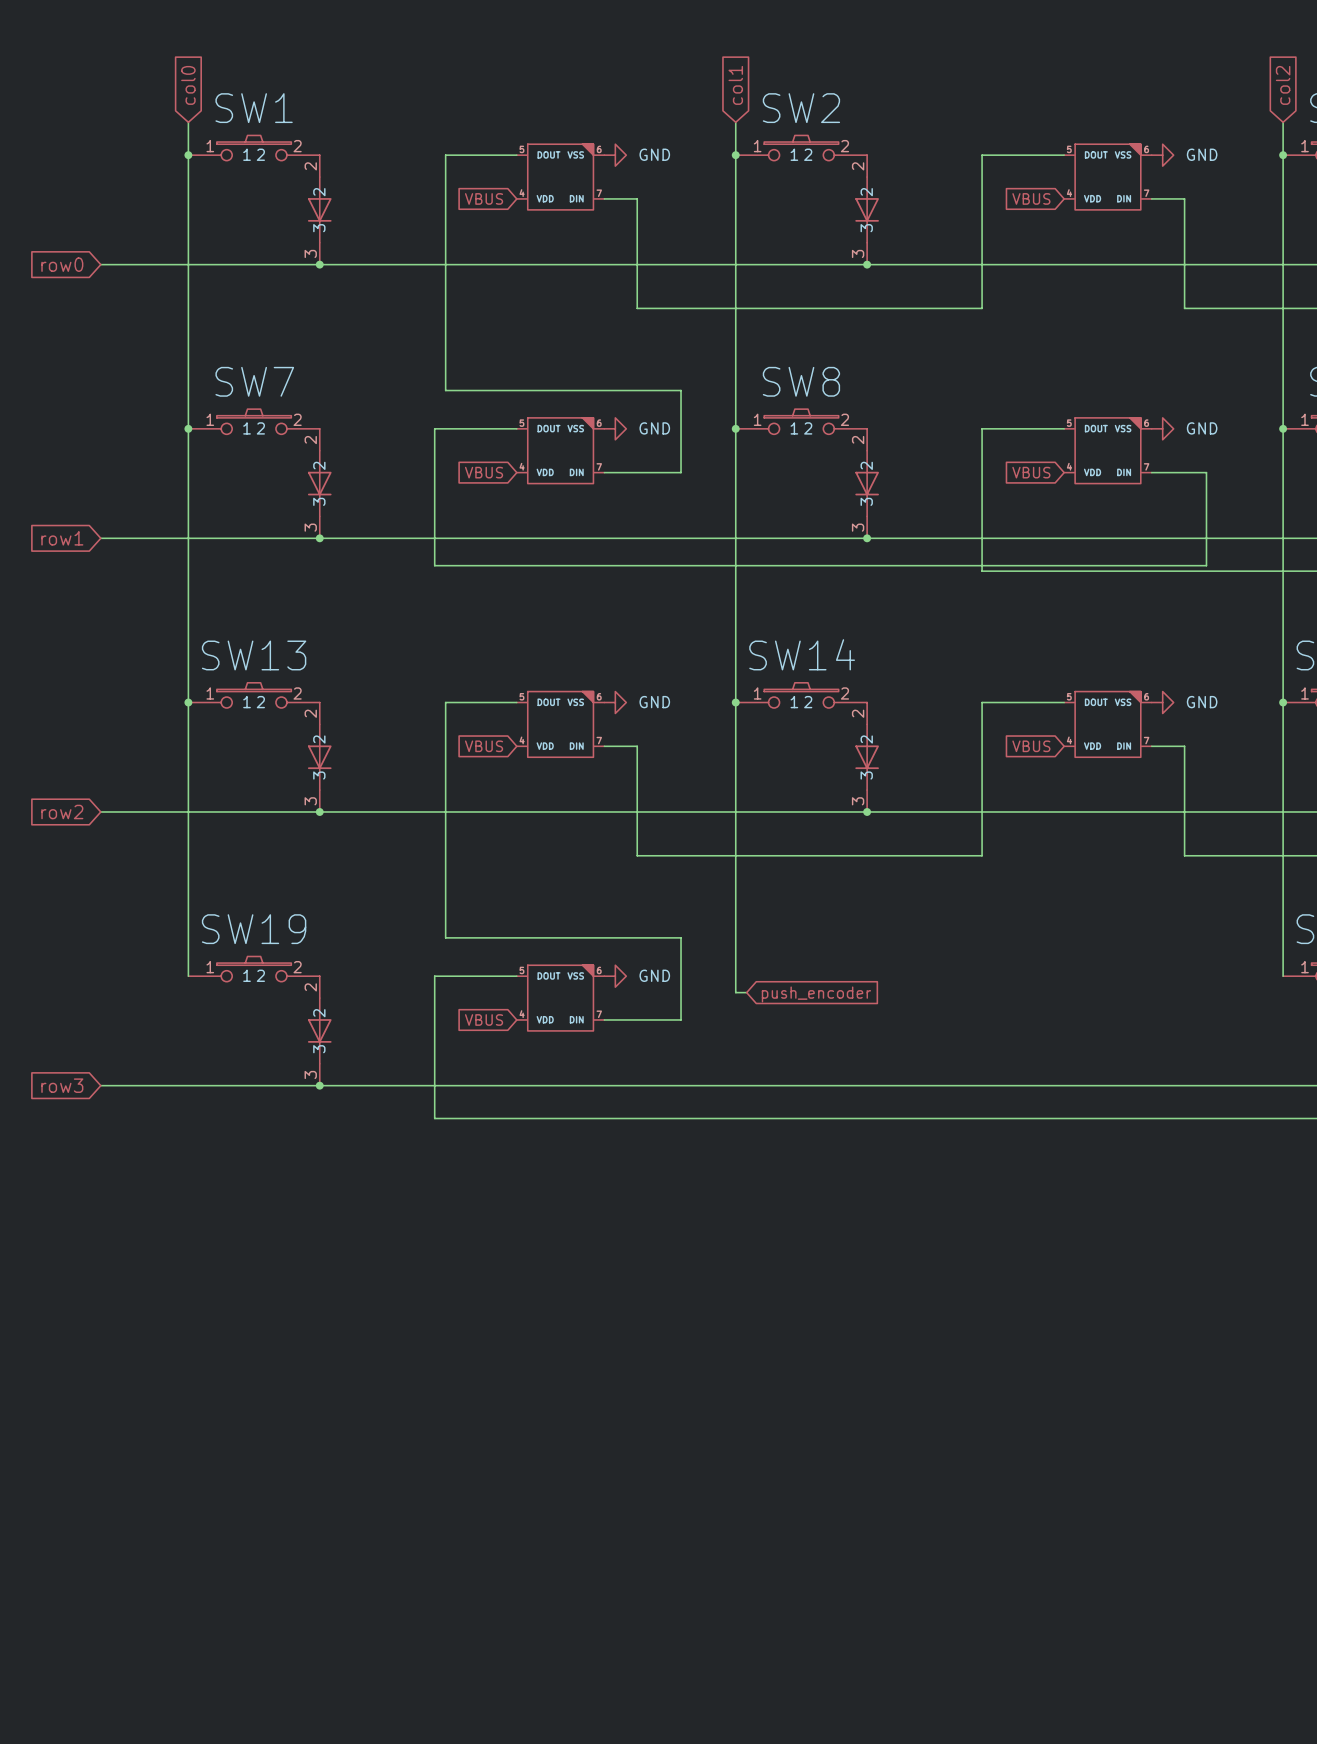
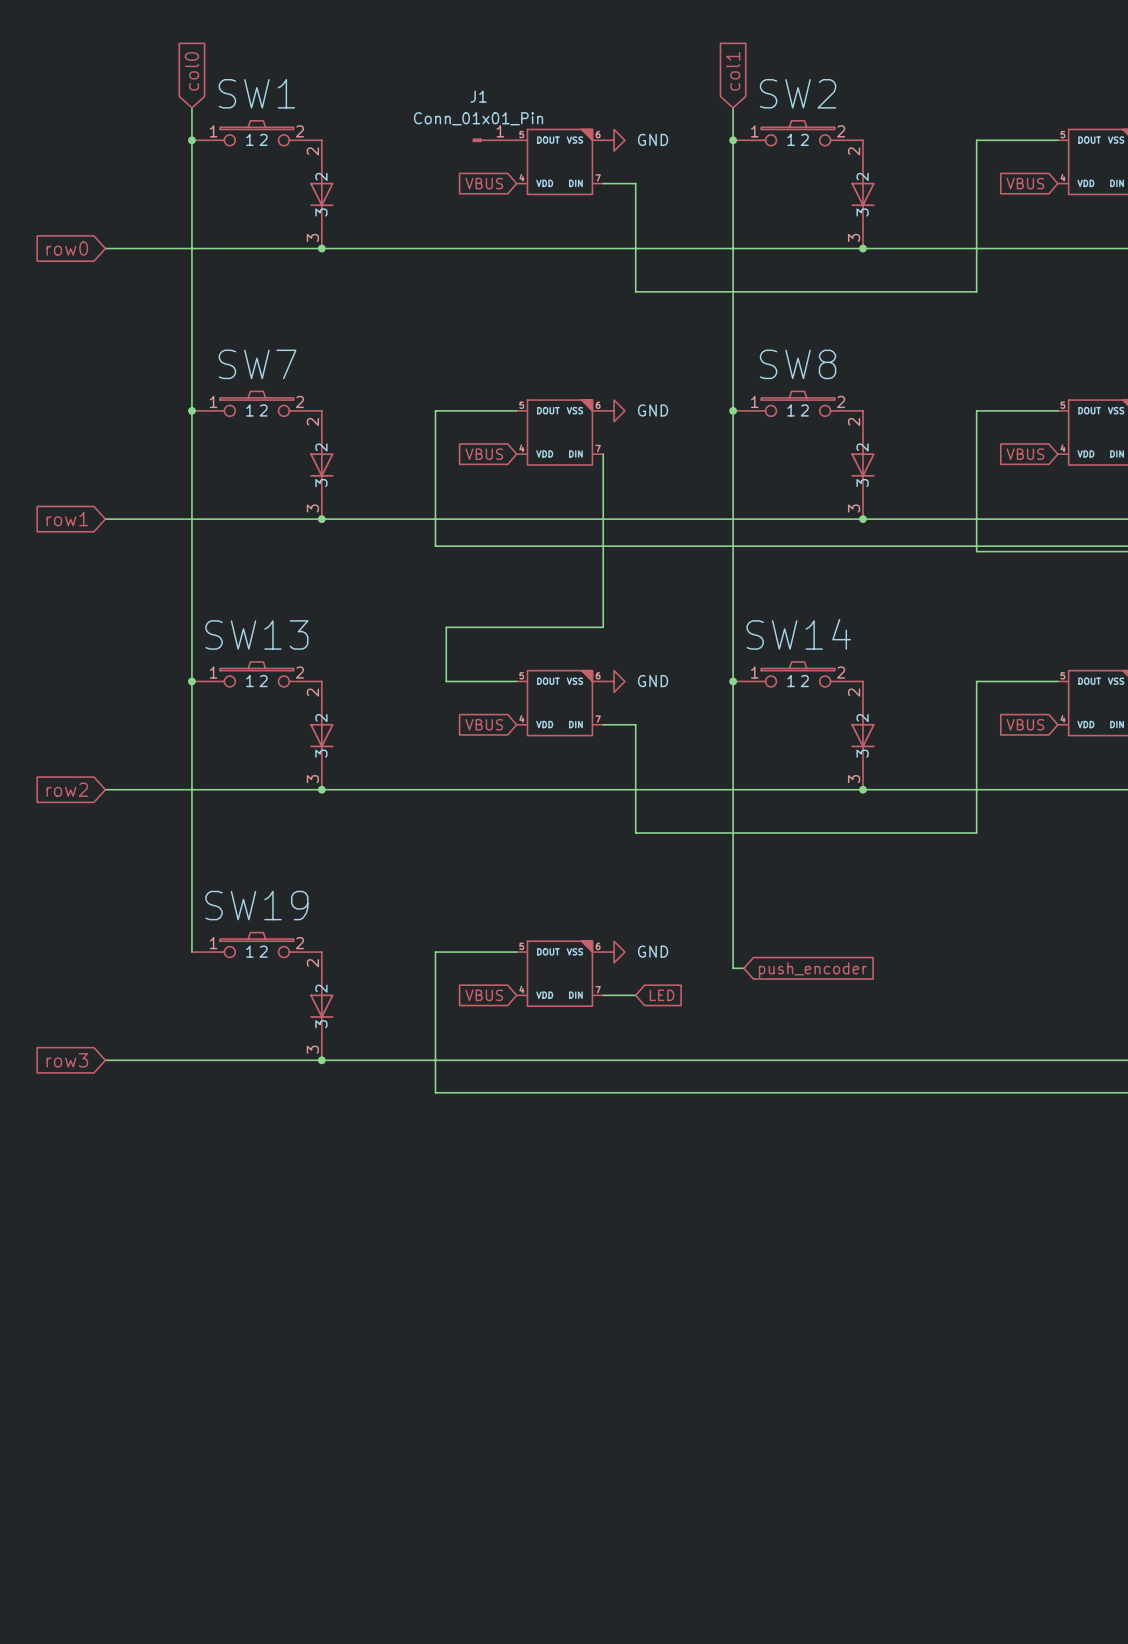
J1: none -> Conn_01x01_Pin (494, 140)
wire: (516, 155) (445, 155) (445, 390) (681, 390) (681, 472) (604, 472) -> none
wire: (445, 702) (445, 937) (681, 937) (681, 1019) (637, 1019) -> (446, 681) (446, 627) (603, 627) (603, 454)
global label: none -> LED (662, 995)

